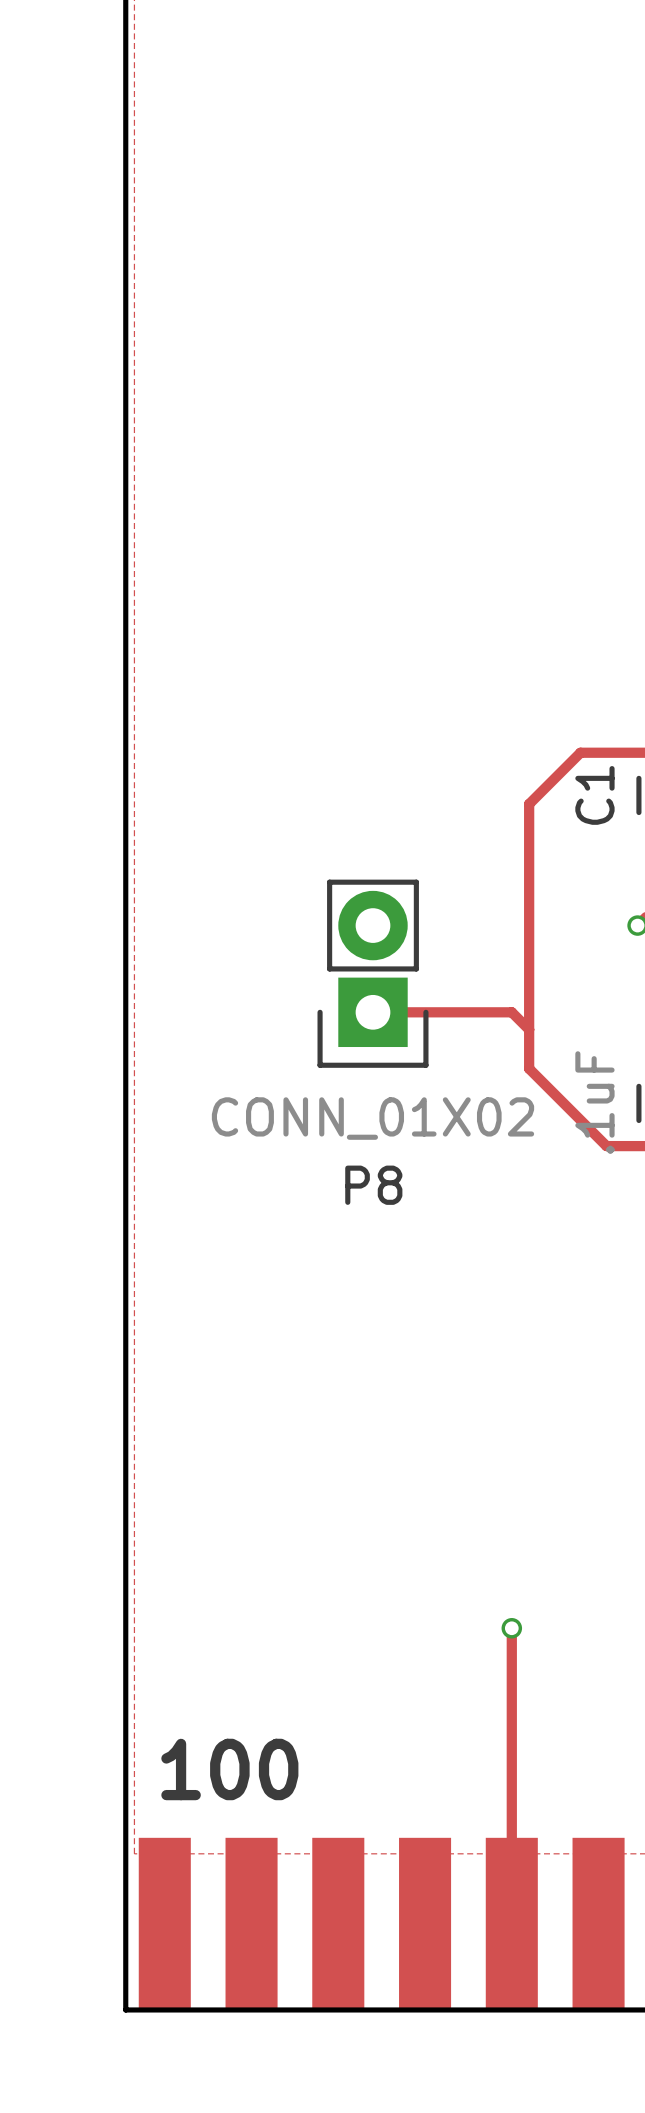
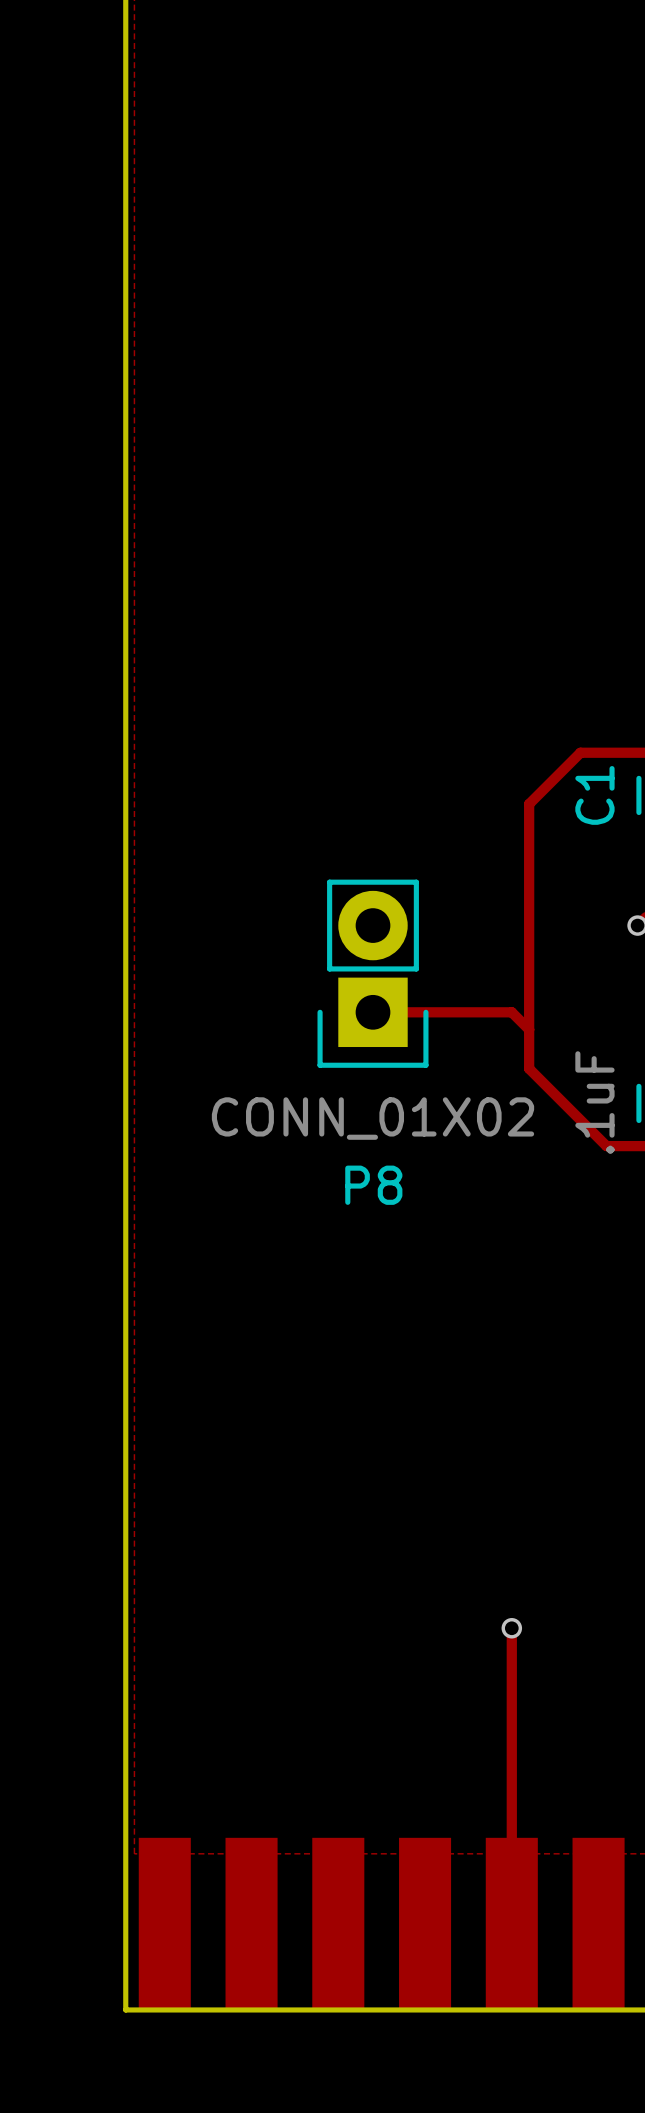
text: 100 (229, 1769) -> none

